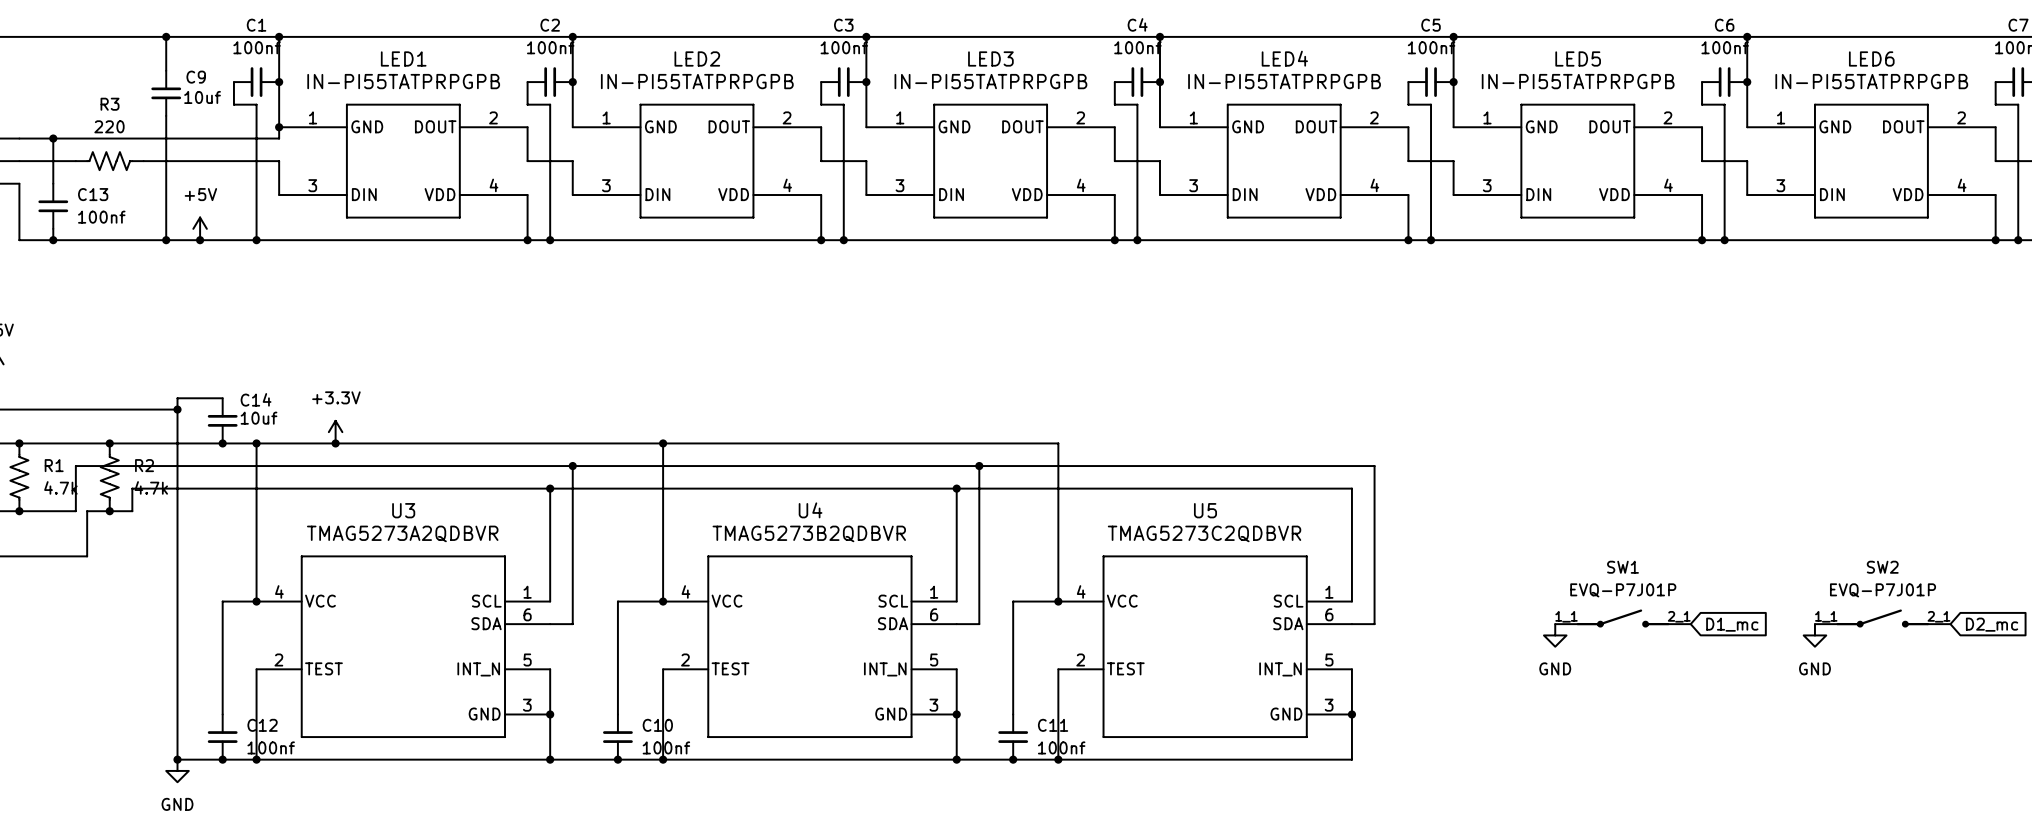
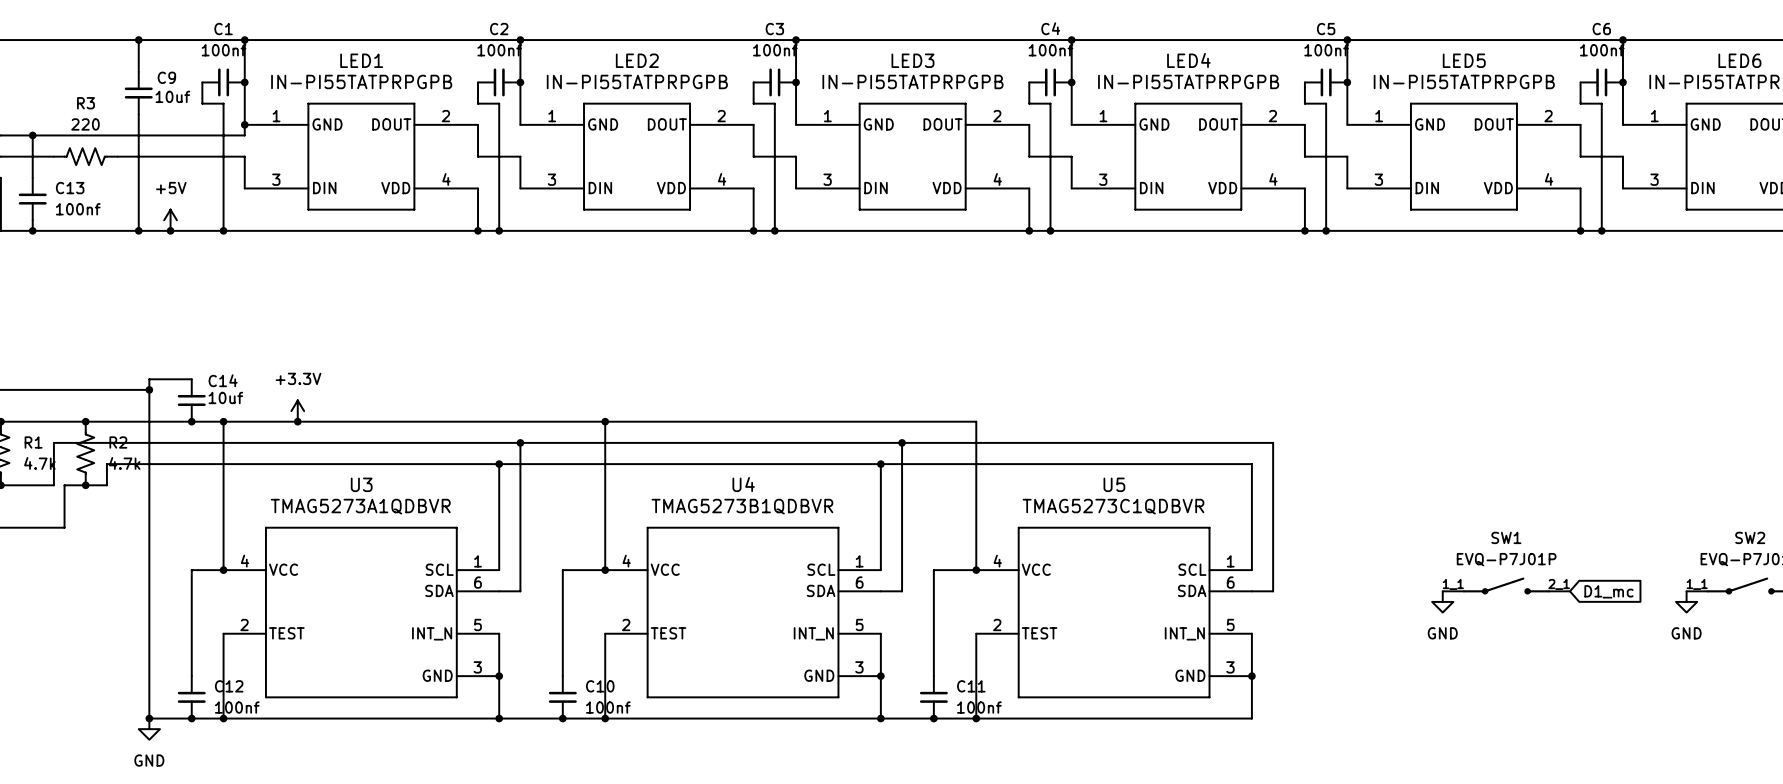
U3 value: TMAG5273A2QDBVR (402, 533) -> TMAG5273A1QDBVR (360, 506)
U4 value: TMAG5273B2QDBVR (809, 533) -> TMAG5273B1QDBVR (742, 506)
U5 value: TMAG5273C2QDBVR (1204, 533) -> TMAG5273C1QDBVR (1113, 506)

